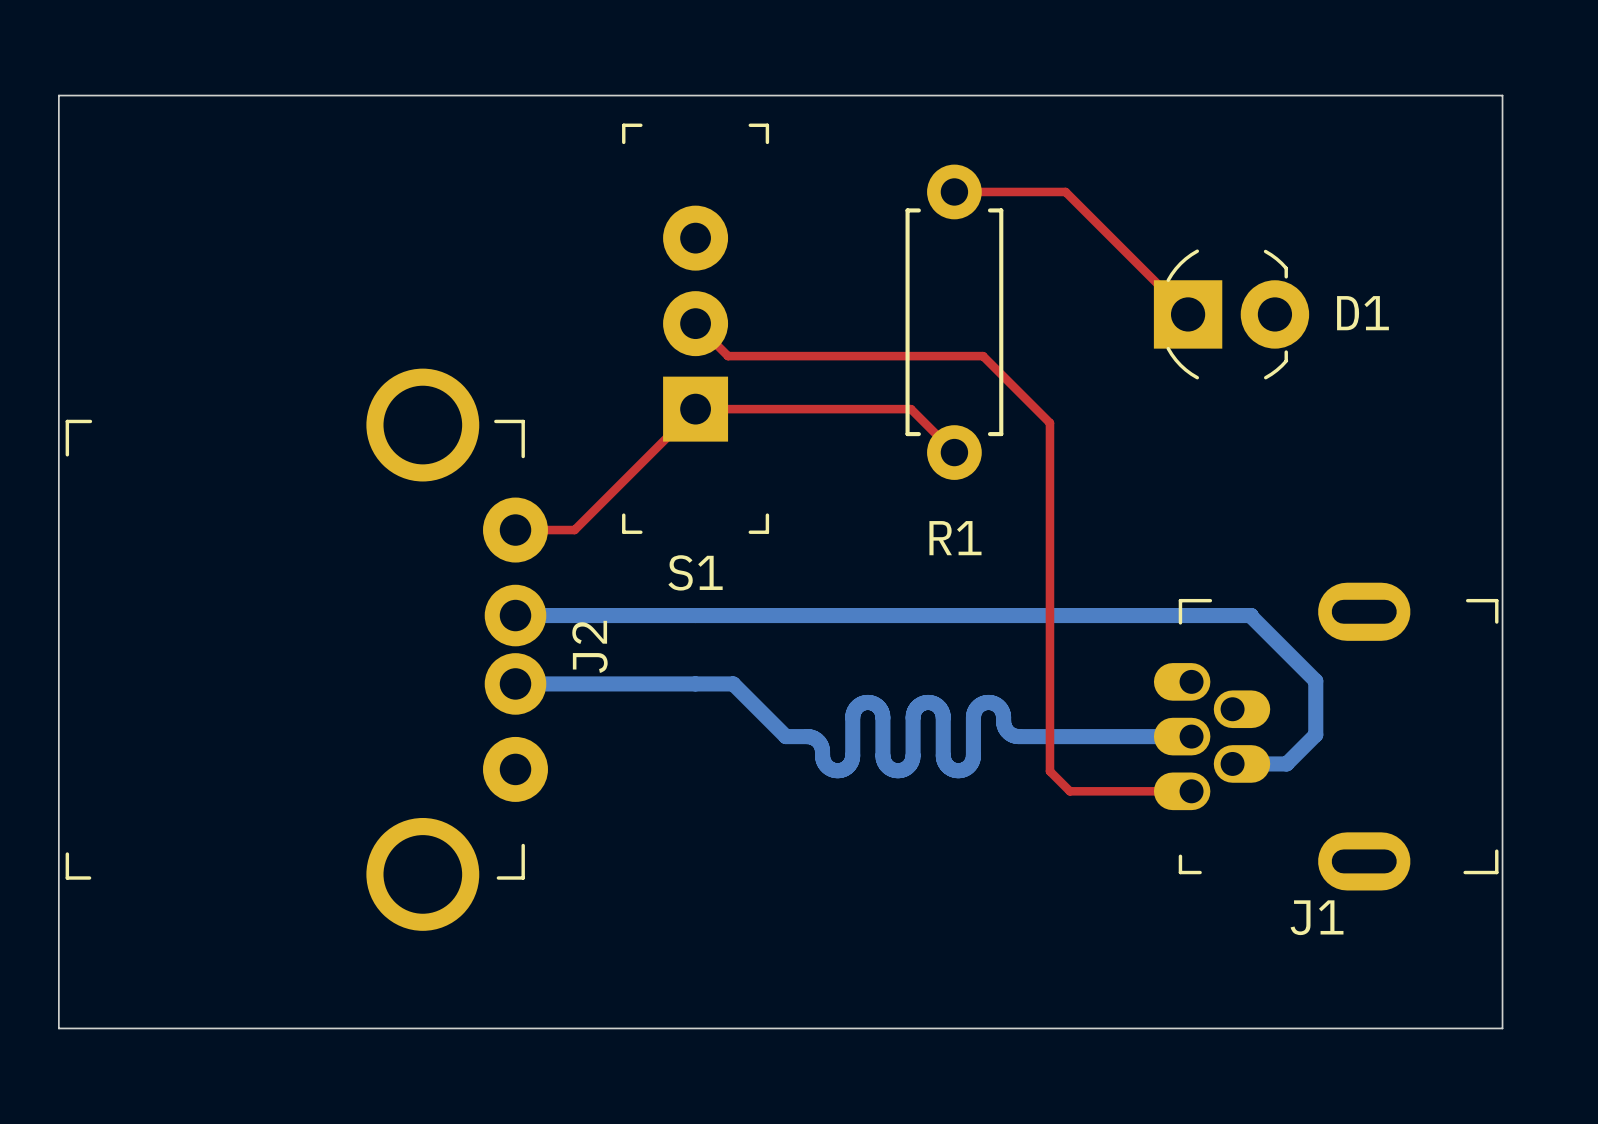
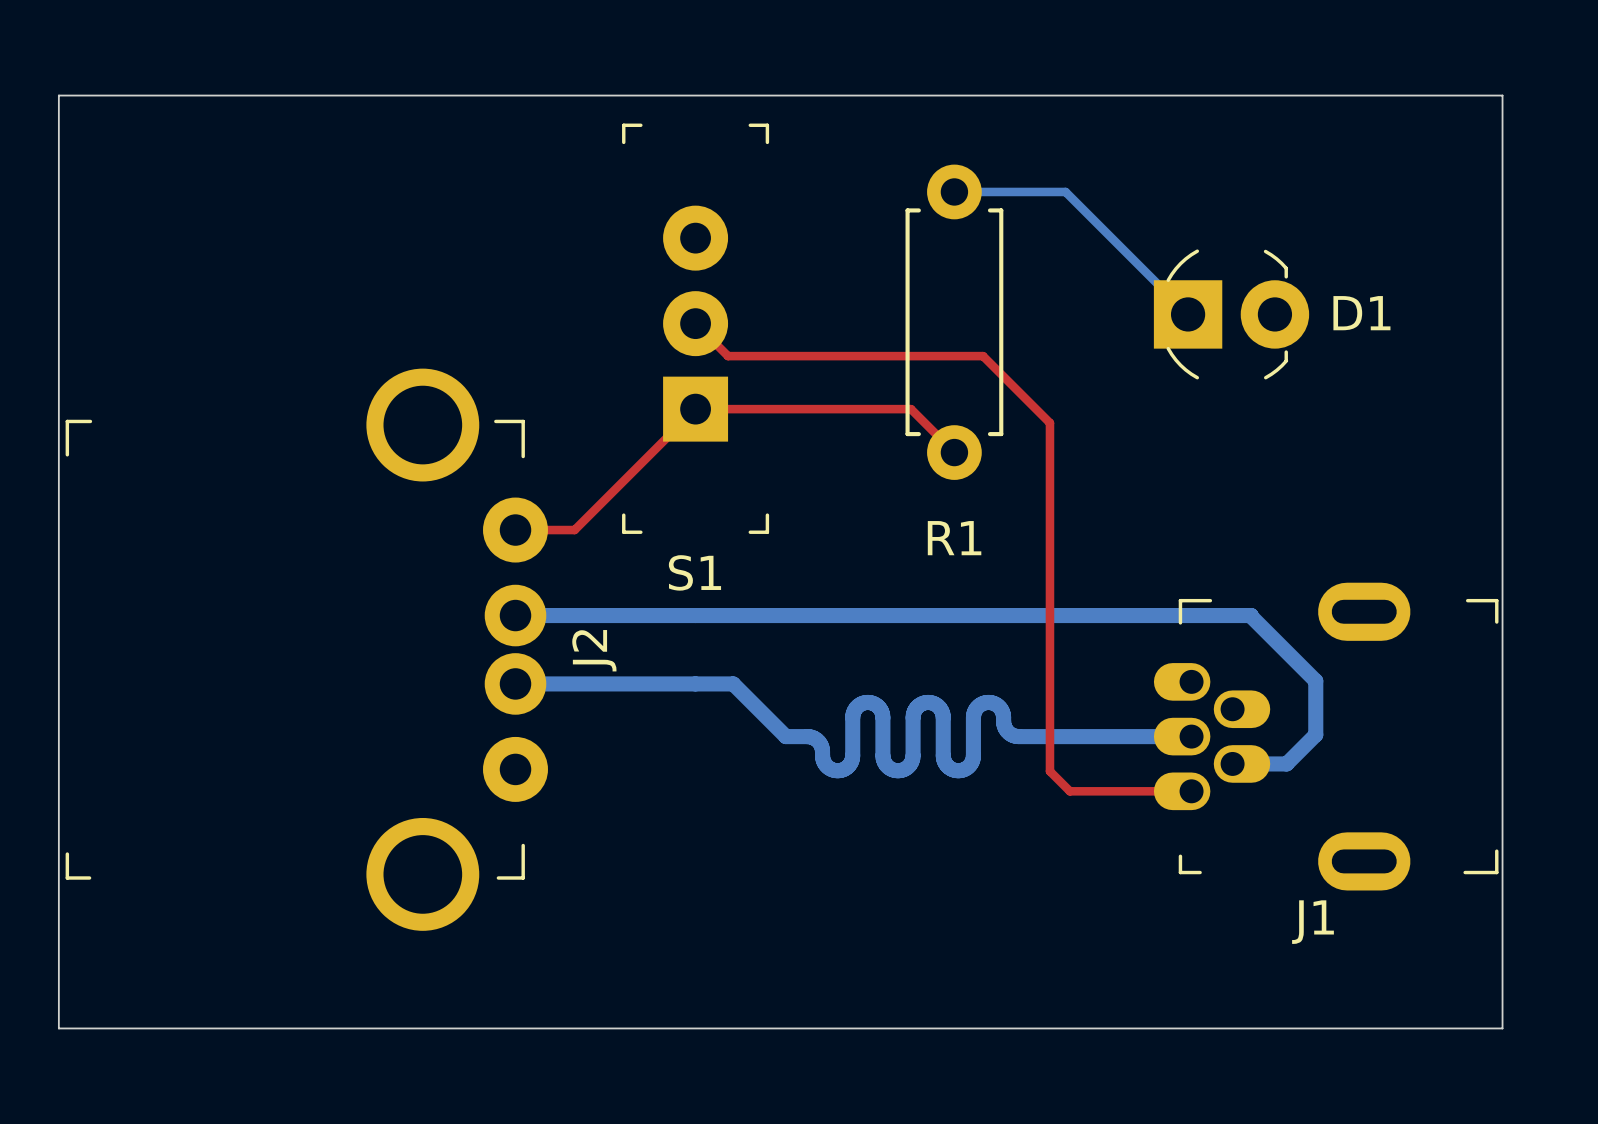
top track: (954, 191) (1065, 191) (1188, 314) -> none
bottom track: none -> (954, 191) (1065, 191) (1188, 314)

